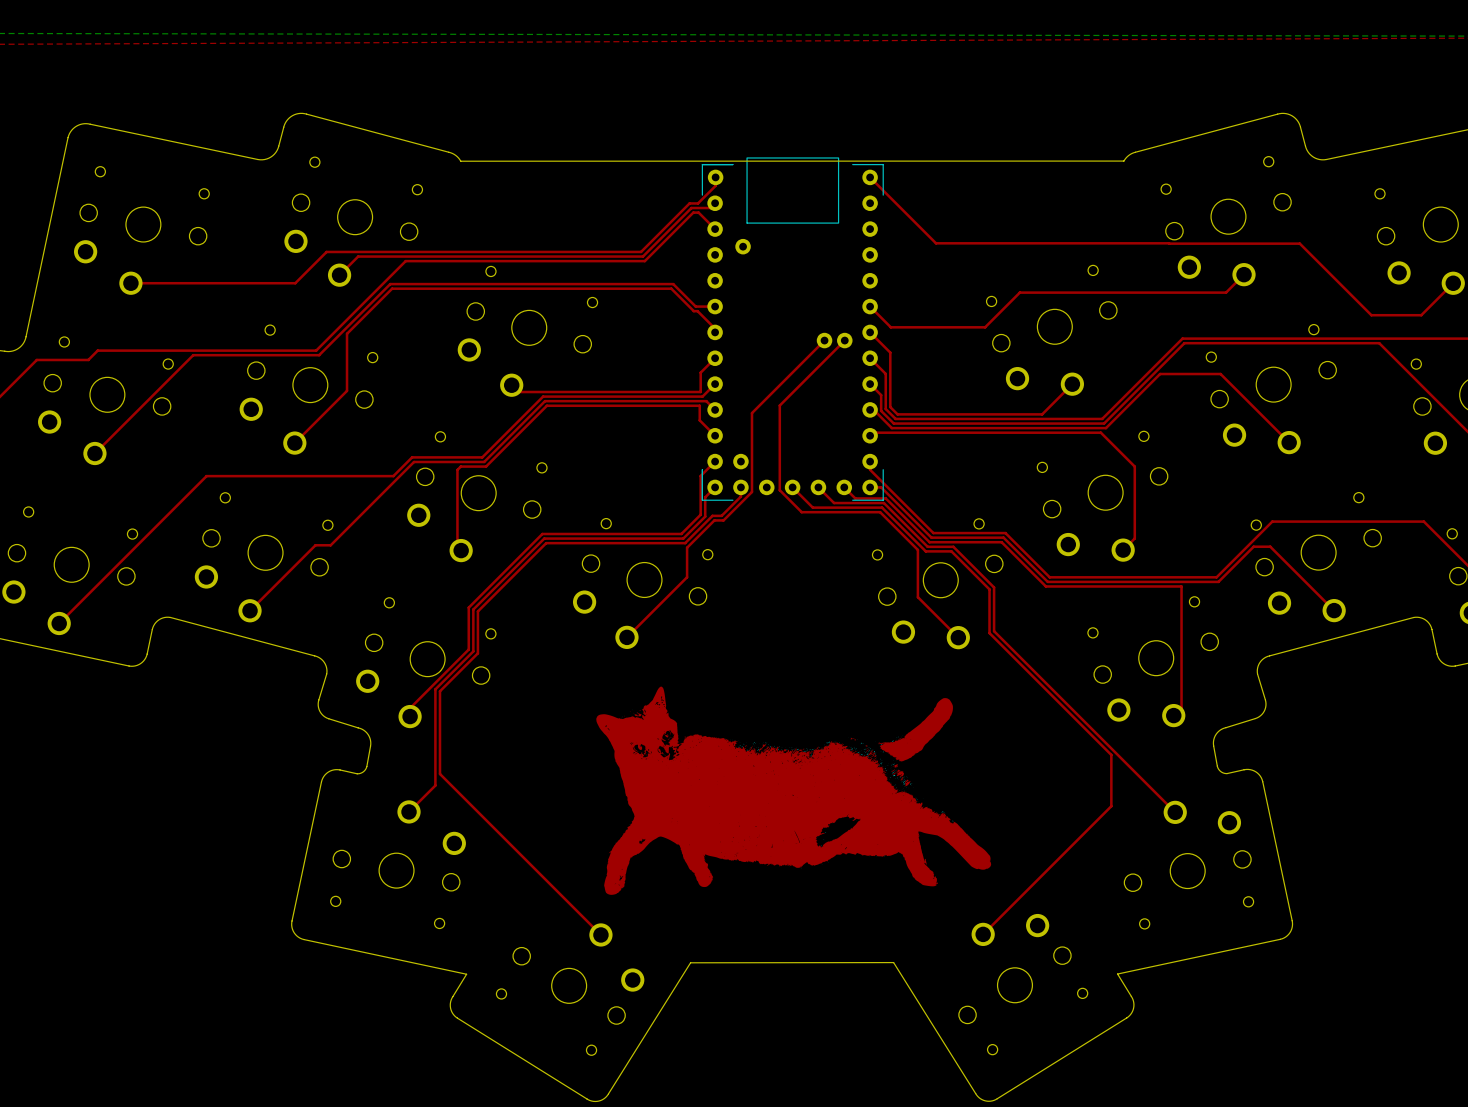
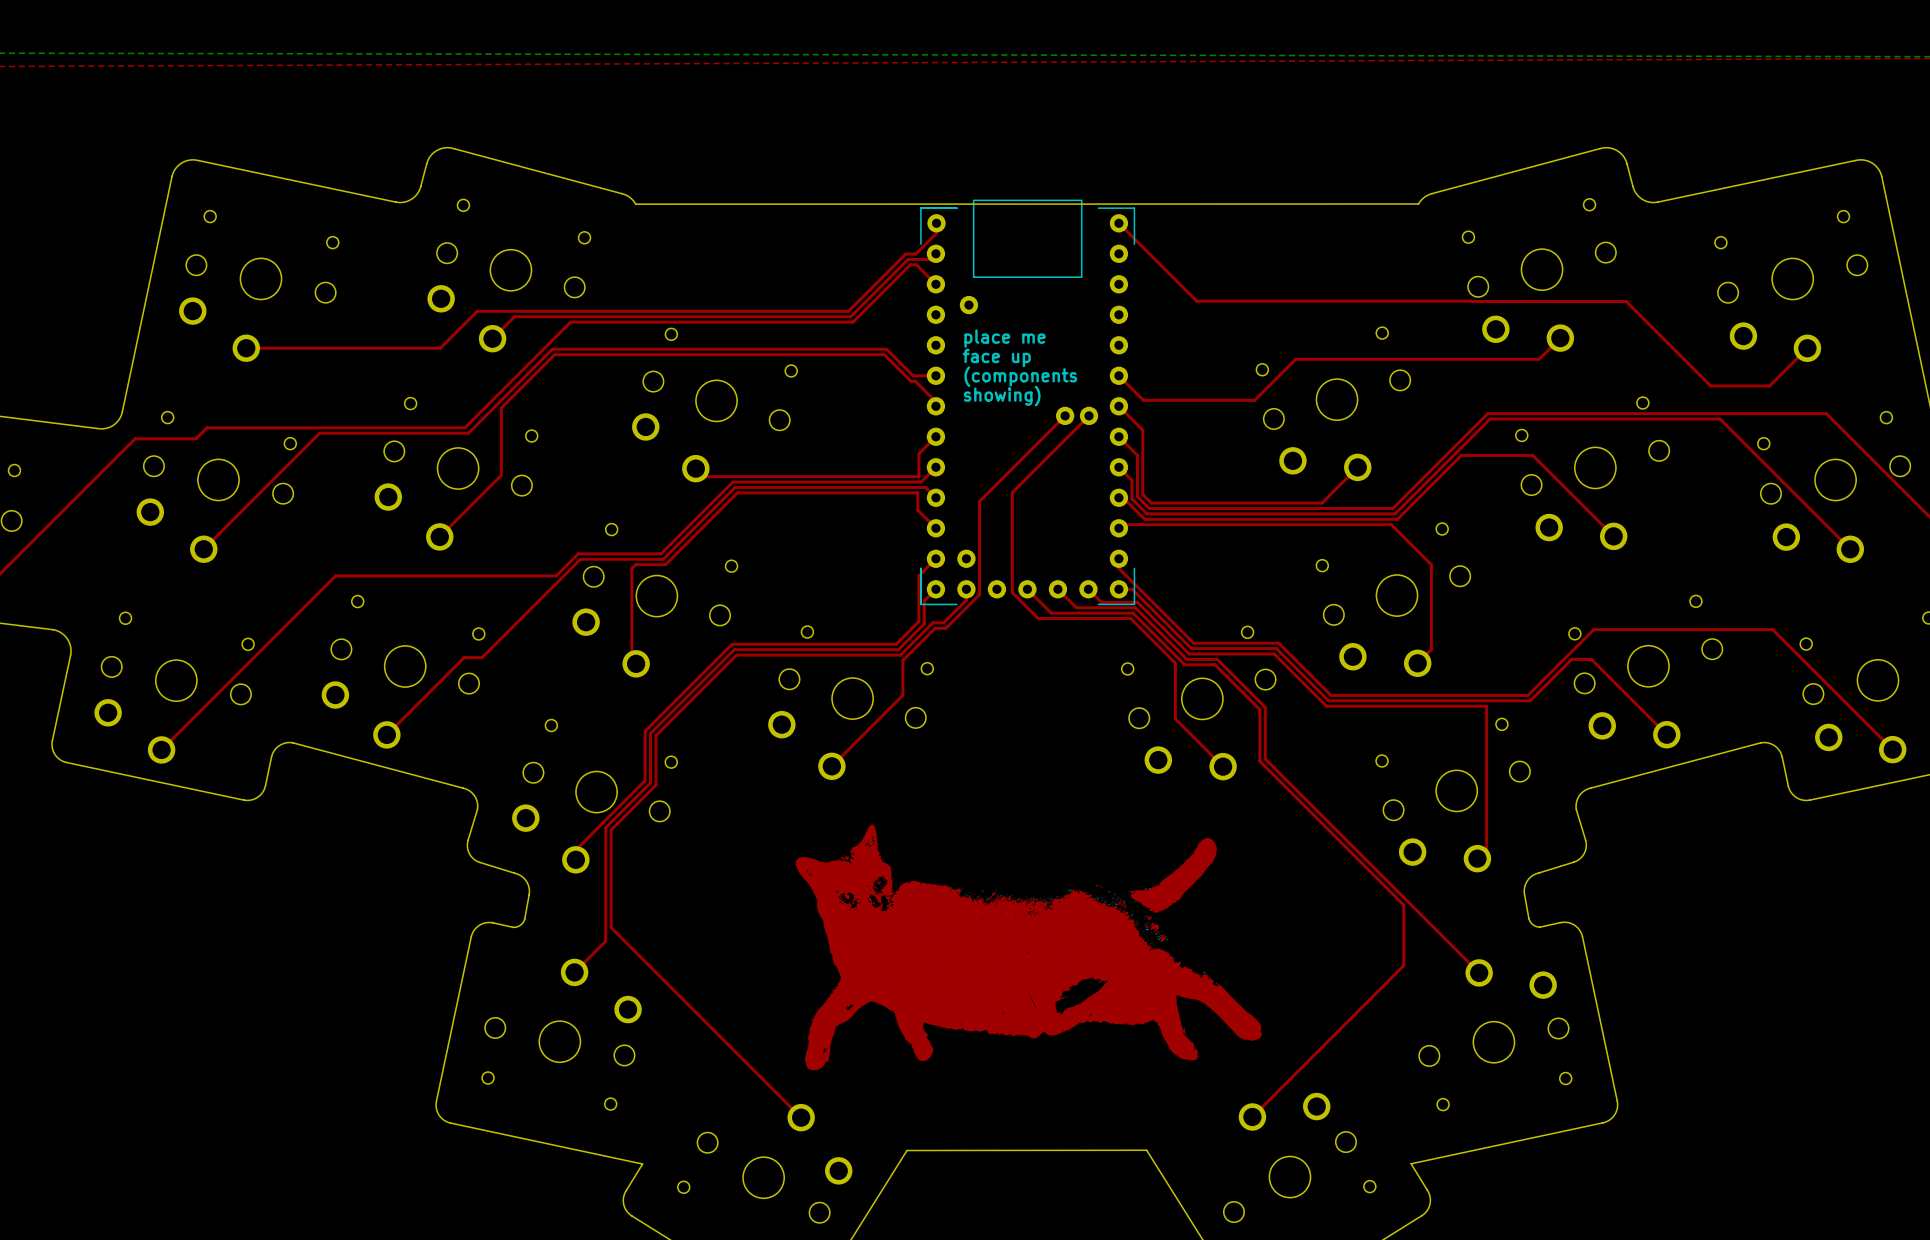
text: none -> place me (1005, 338)
text: none -> face up (996, 357)
text: none -> (components (1020, 376)
text: none -> showing) (1002, 396)

